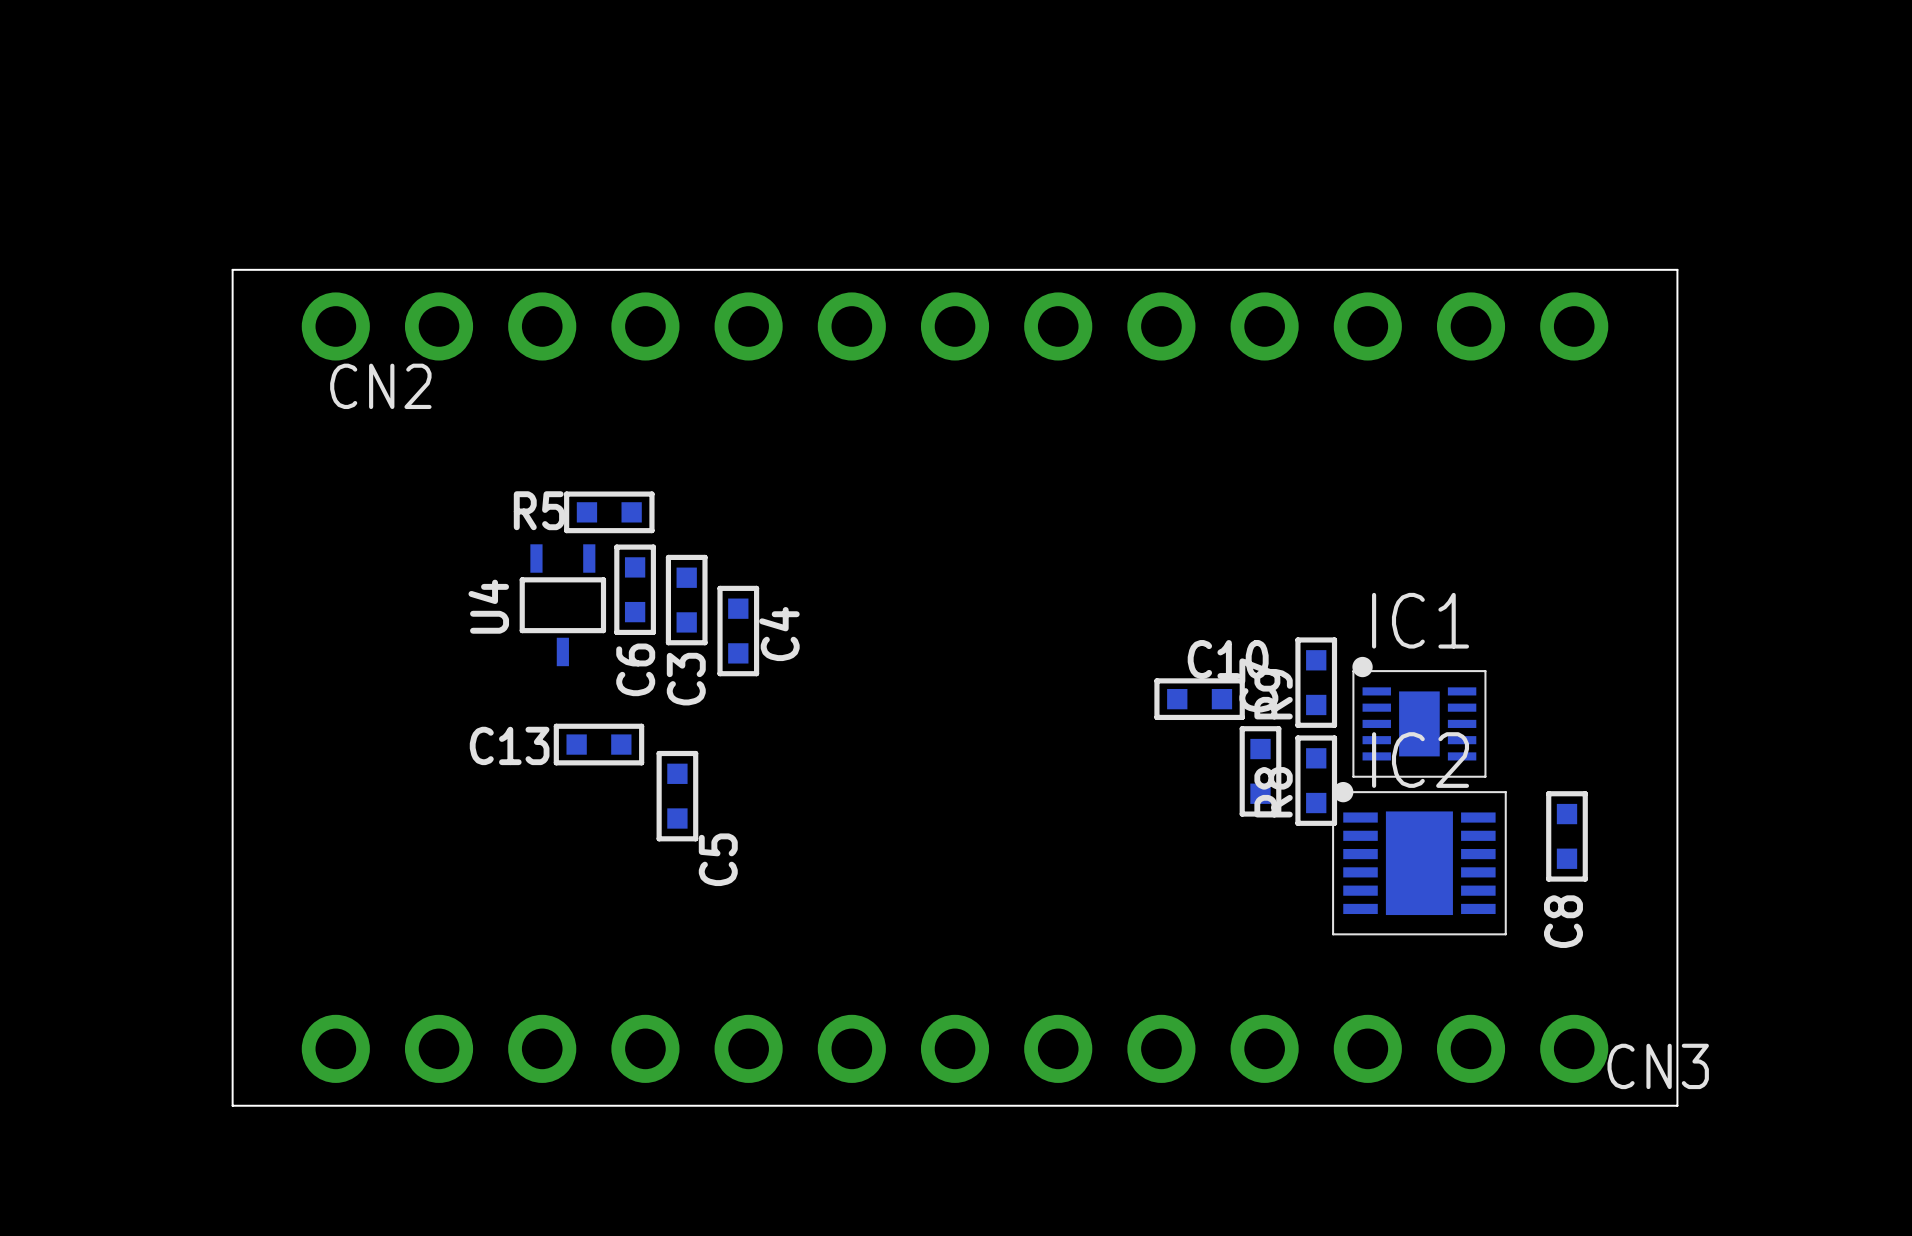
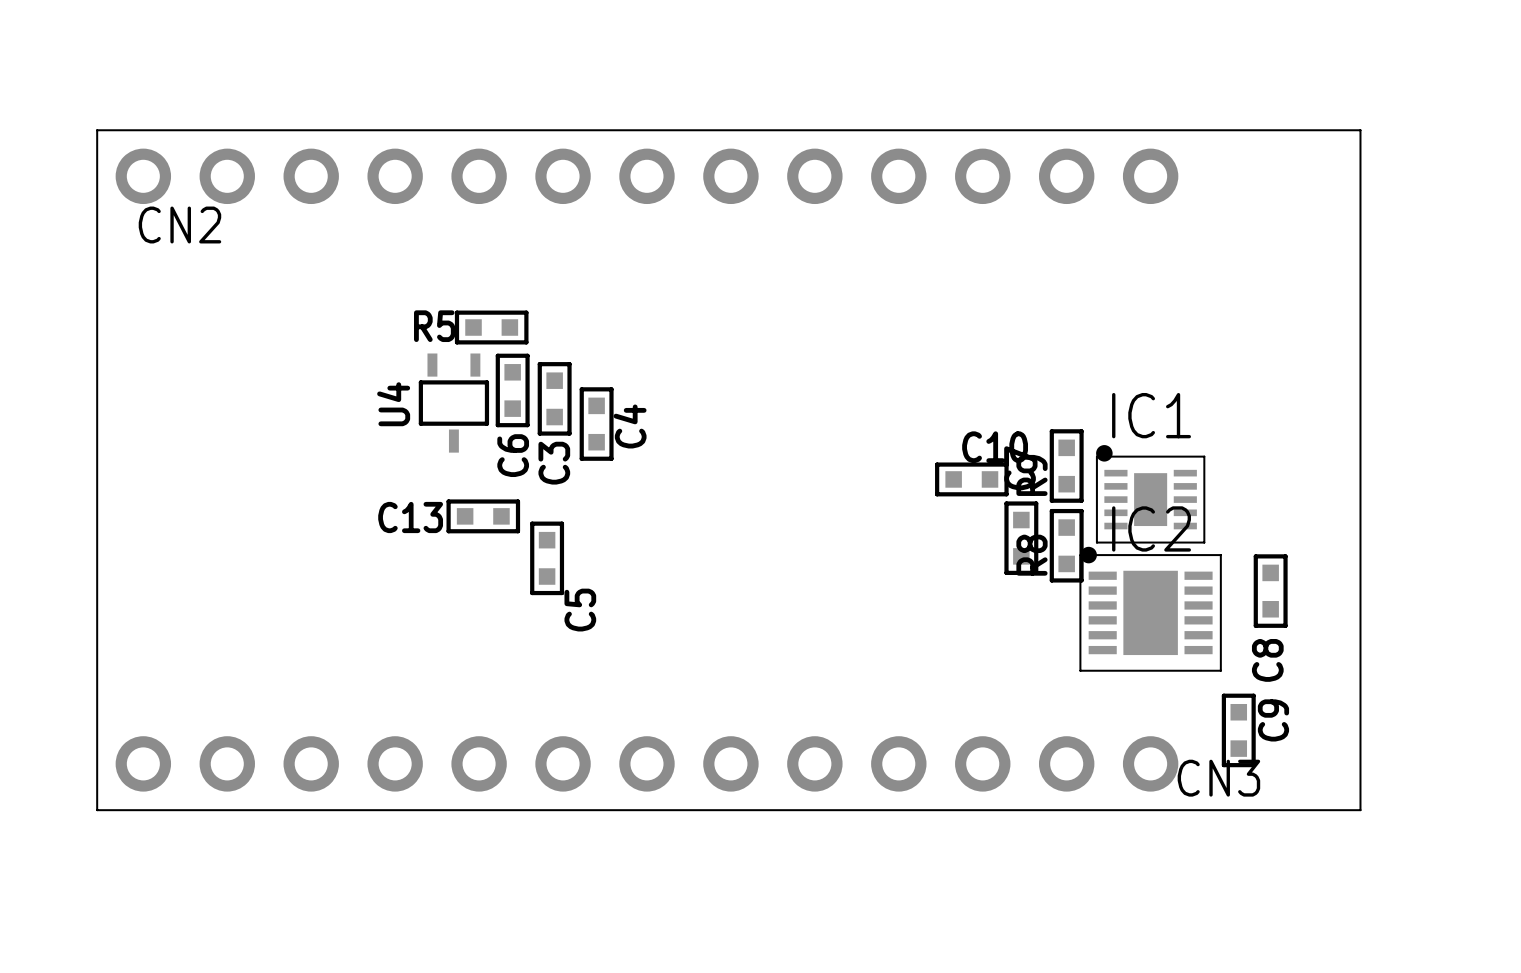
board edge: (232, 269) (232, 1105) -> (185, 130) (97, 130) (97, 810) (185, 810)
CN2 position: (955, 326) -> (646, 176)
C9: none -> (1238, 730)
CN3 position: (955, 1048) -> (646, 763)

